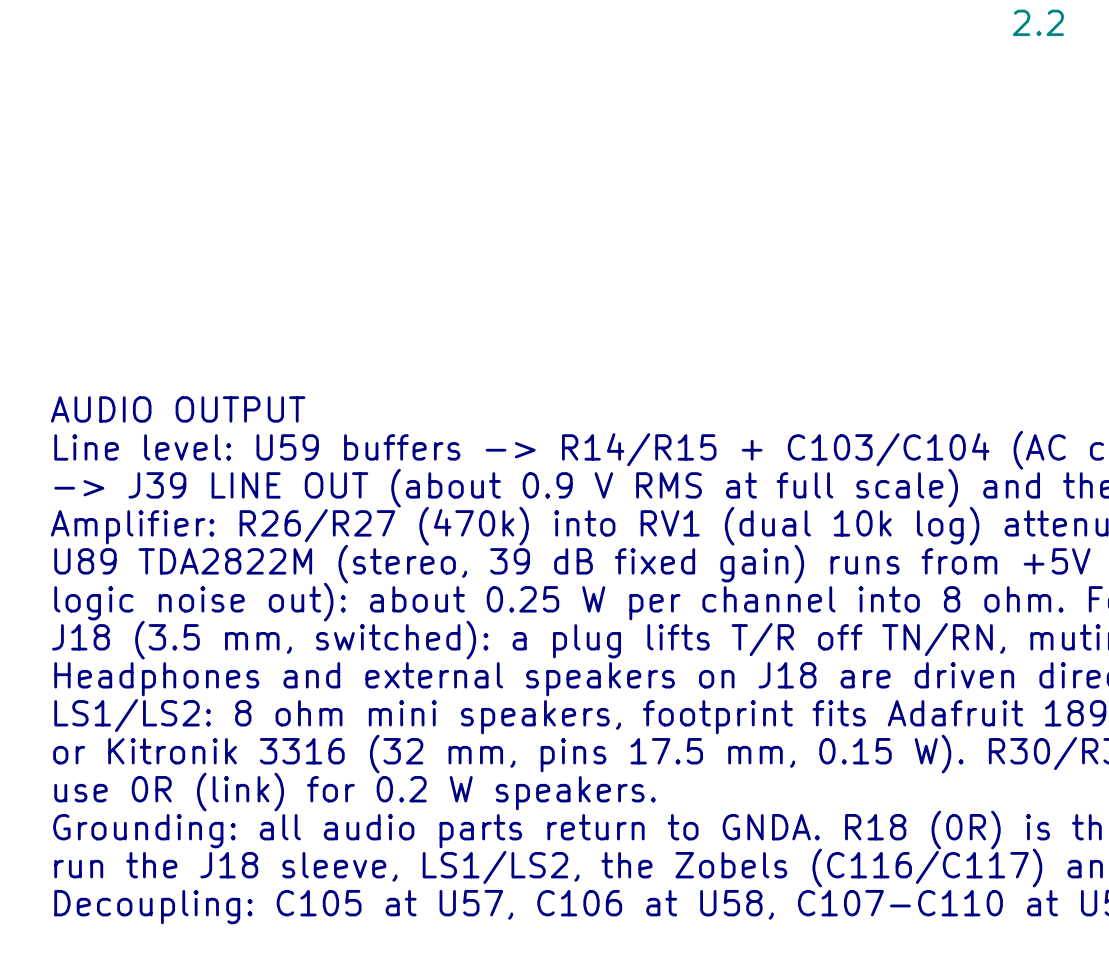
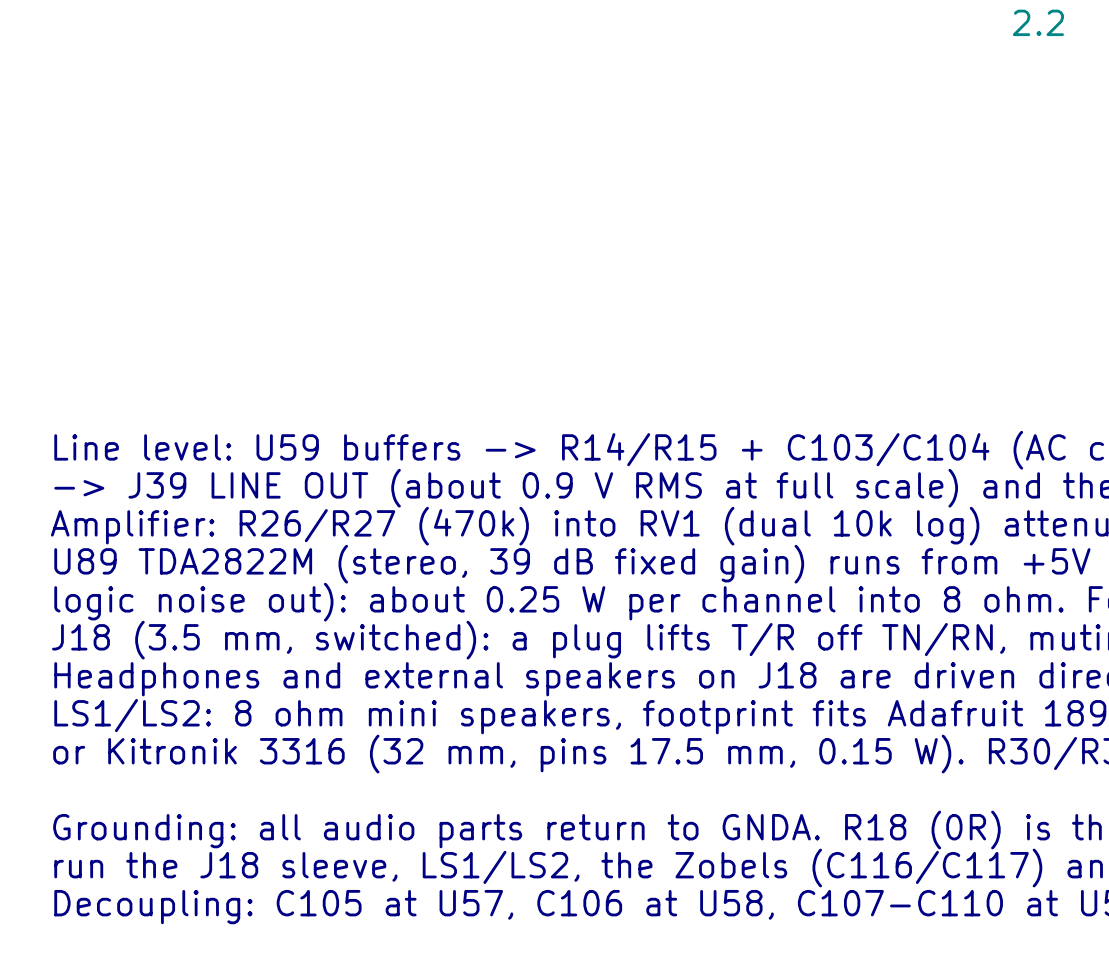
text: AUDIO OUTPUT (178, 409) -> none
text: use 0R (link) for 0.2 W speakers. (355, 792) -> none

